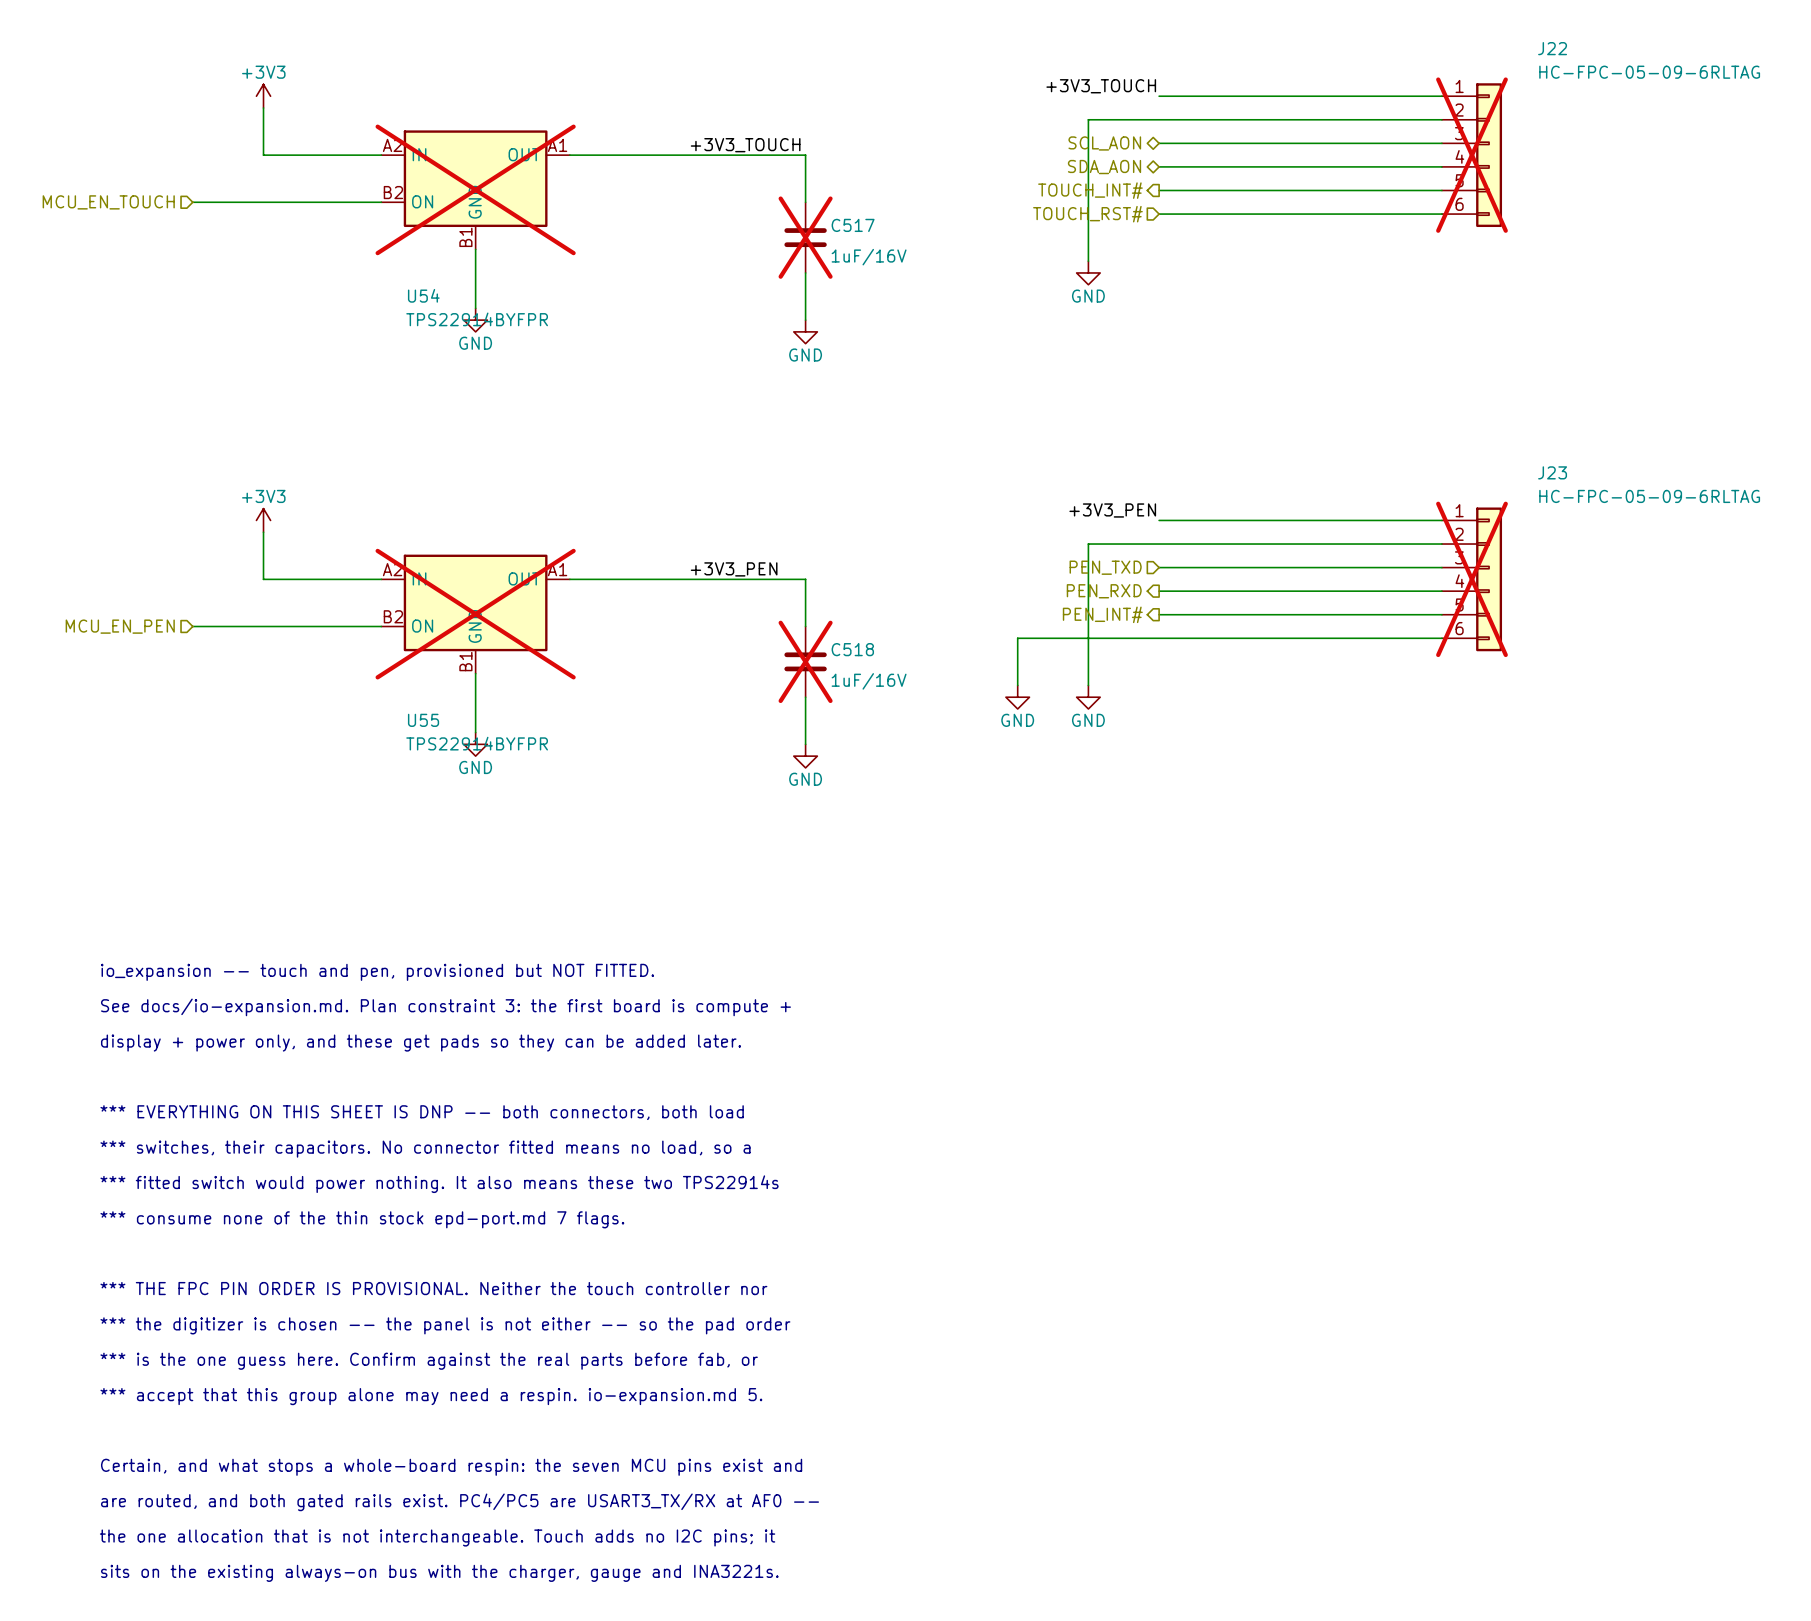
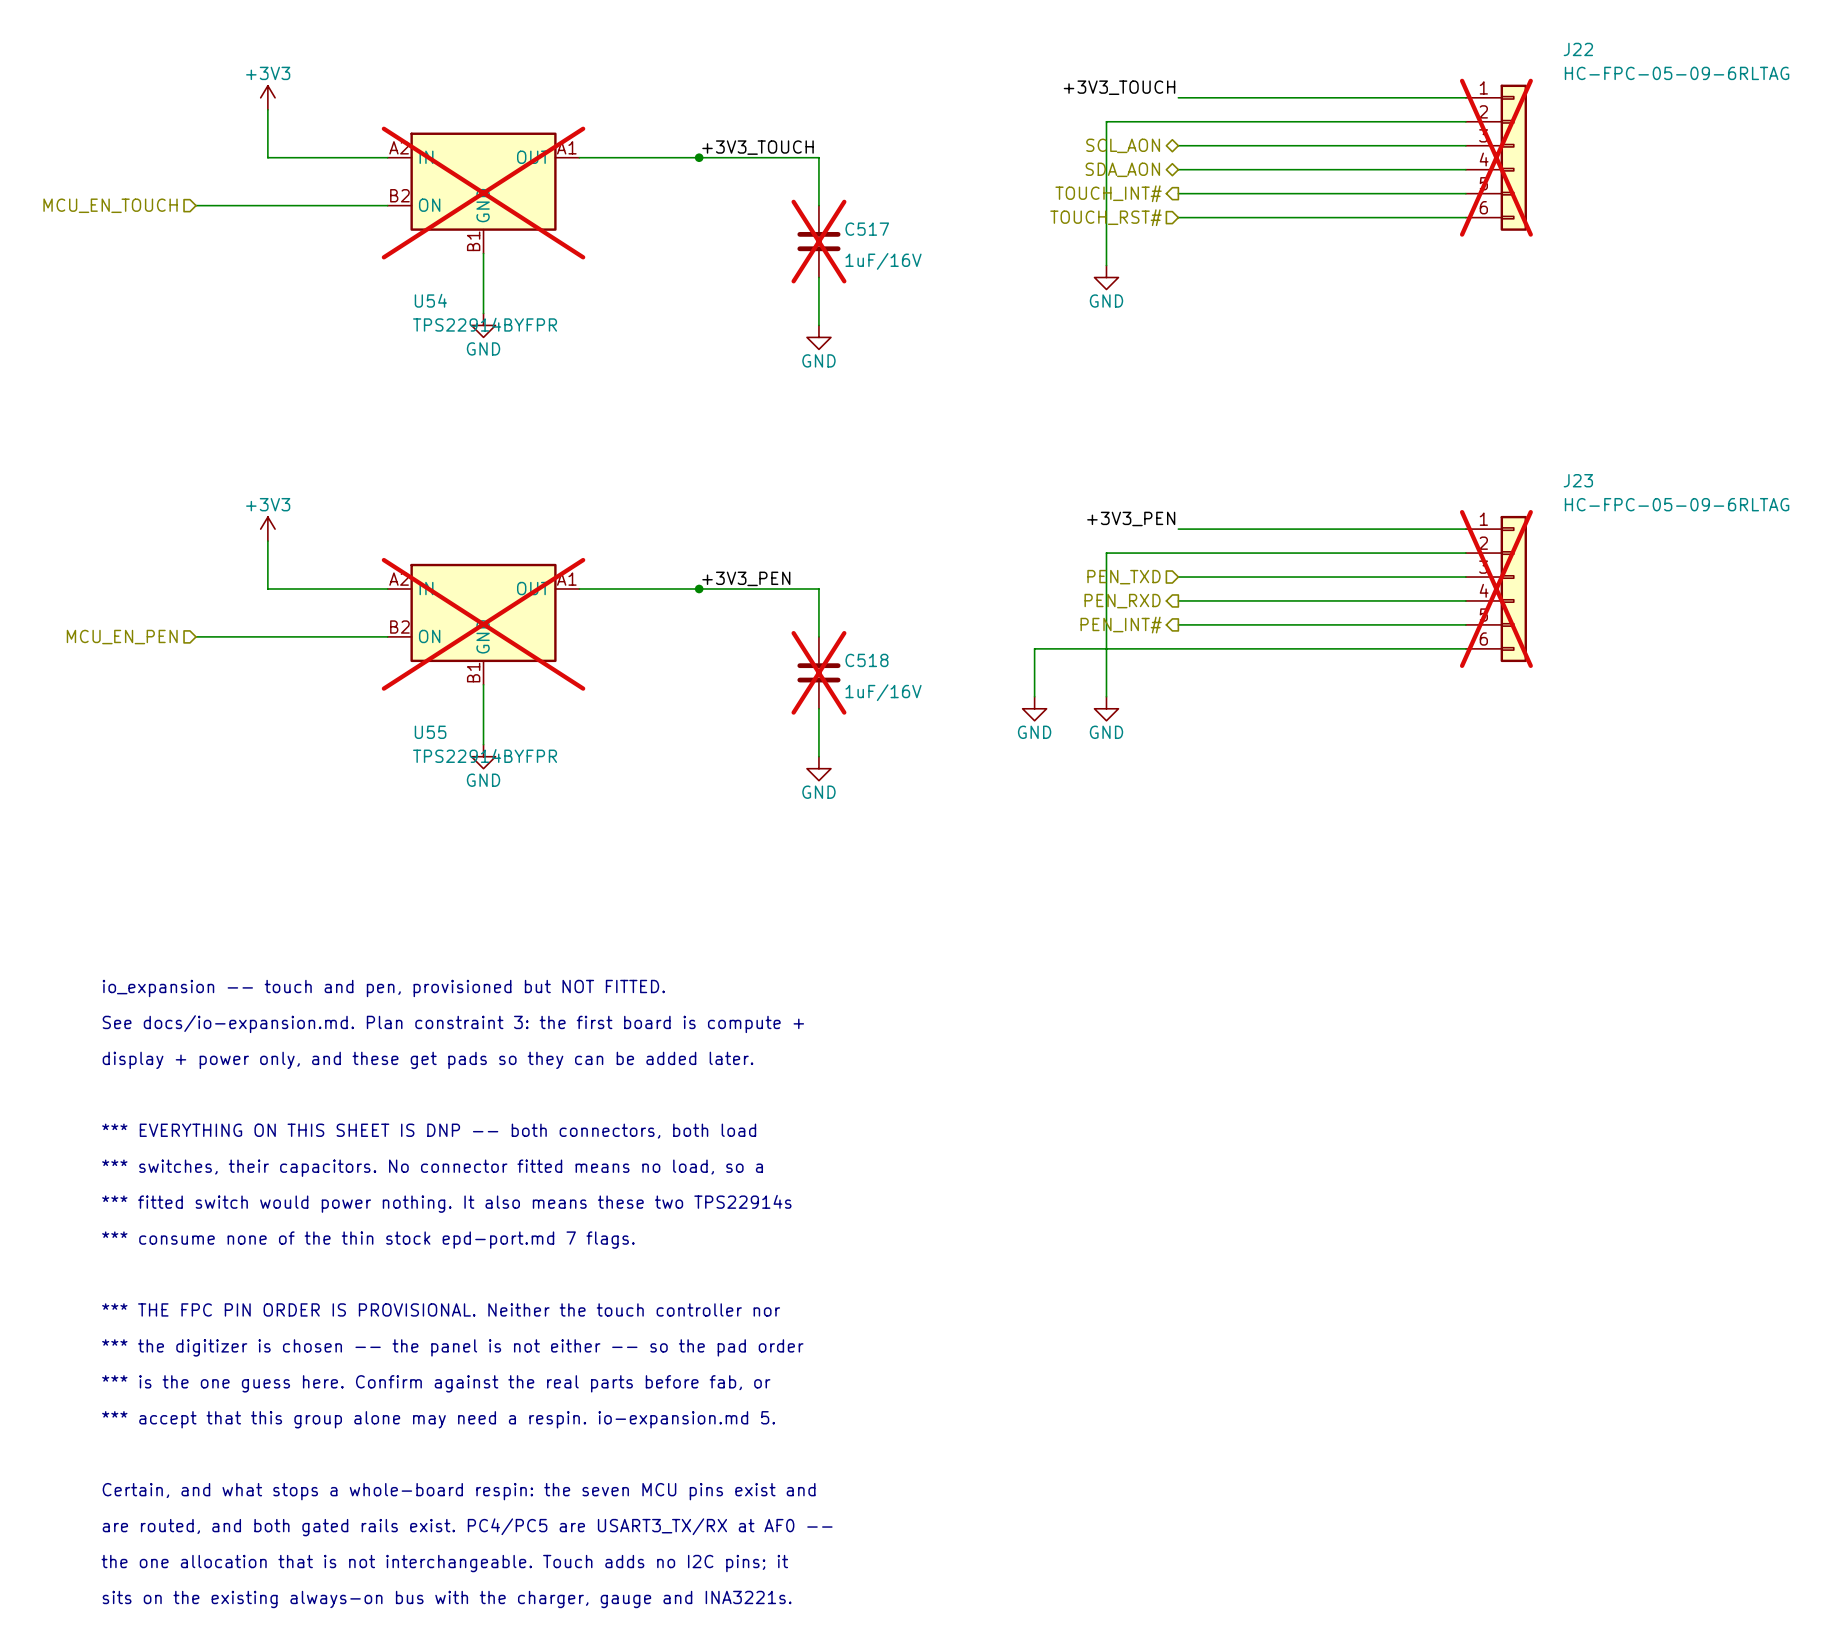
junction: none -> (699, 157)
junction: none -> (699, 588)

